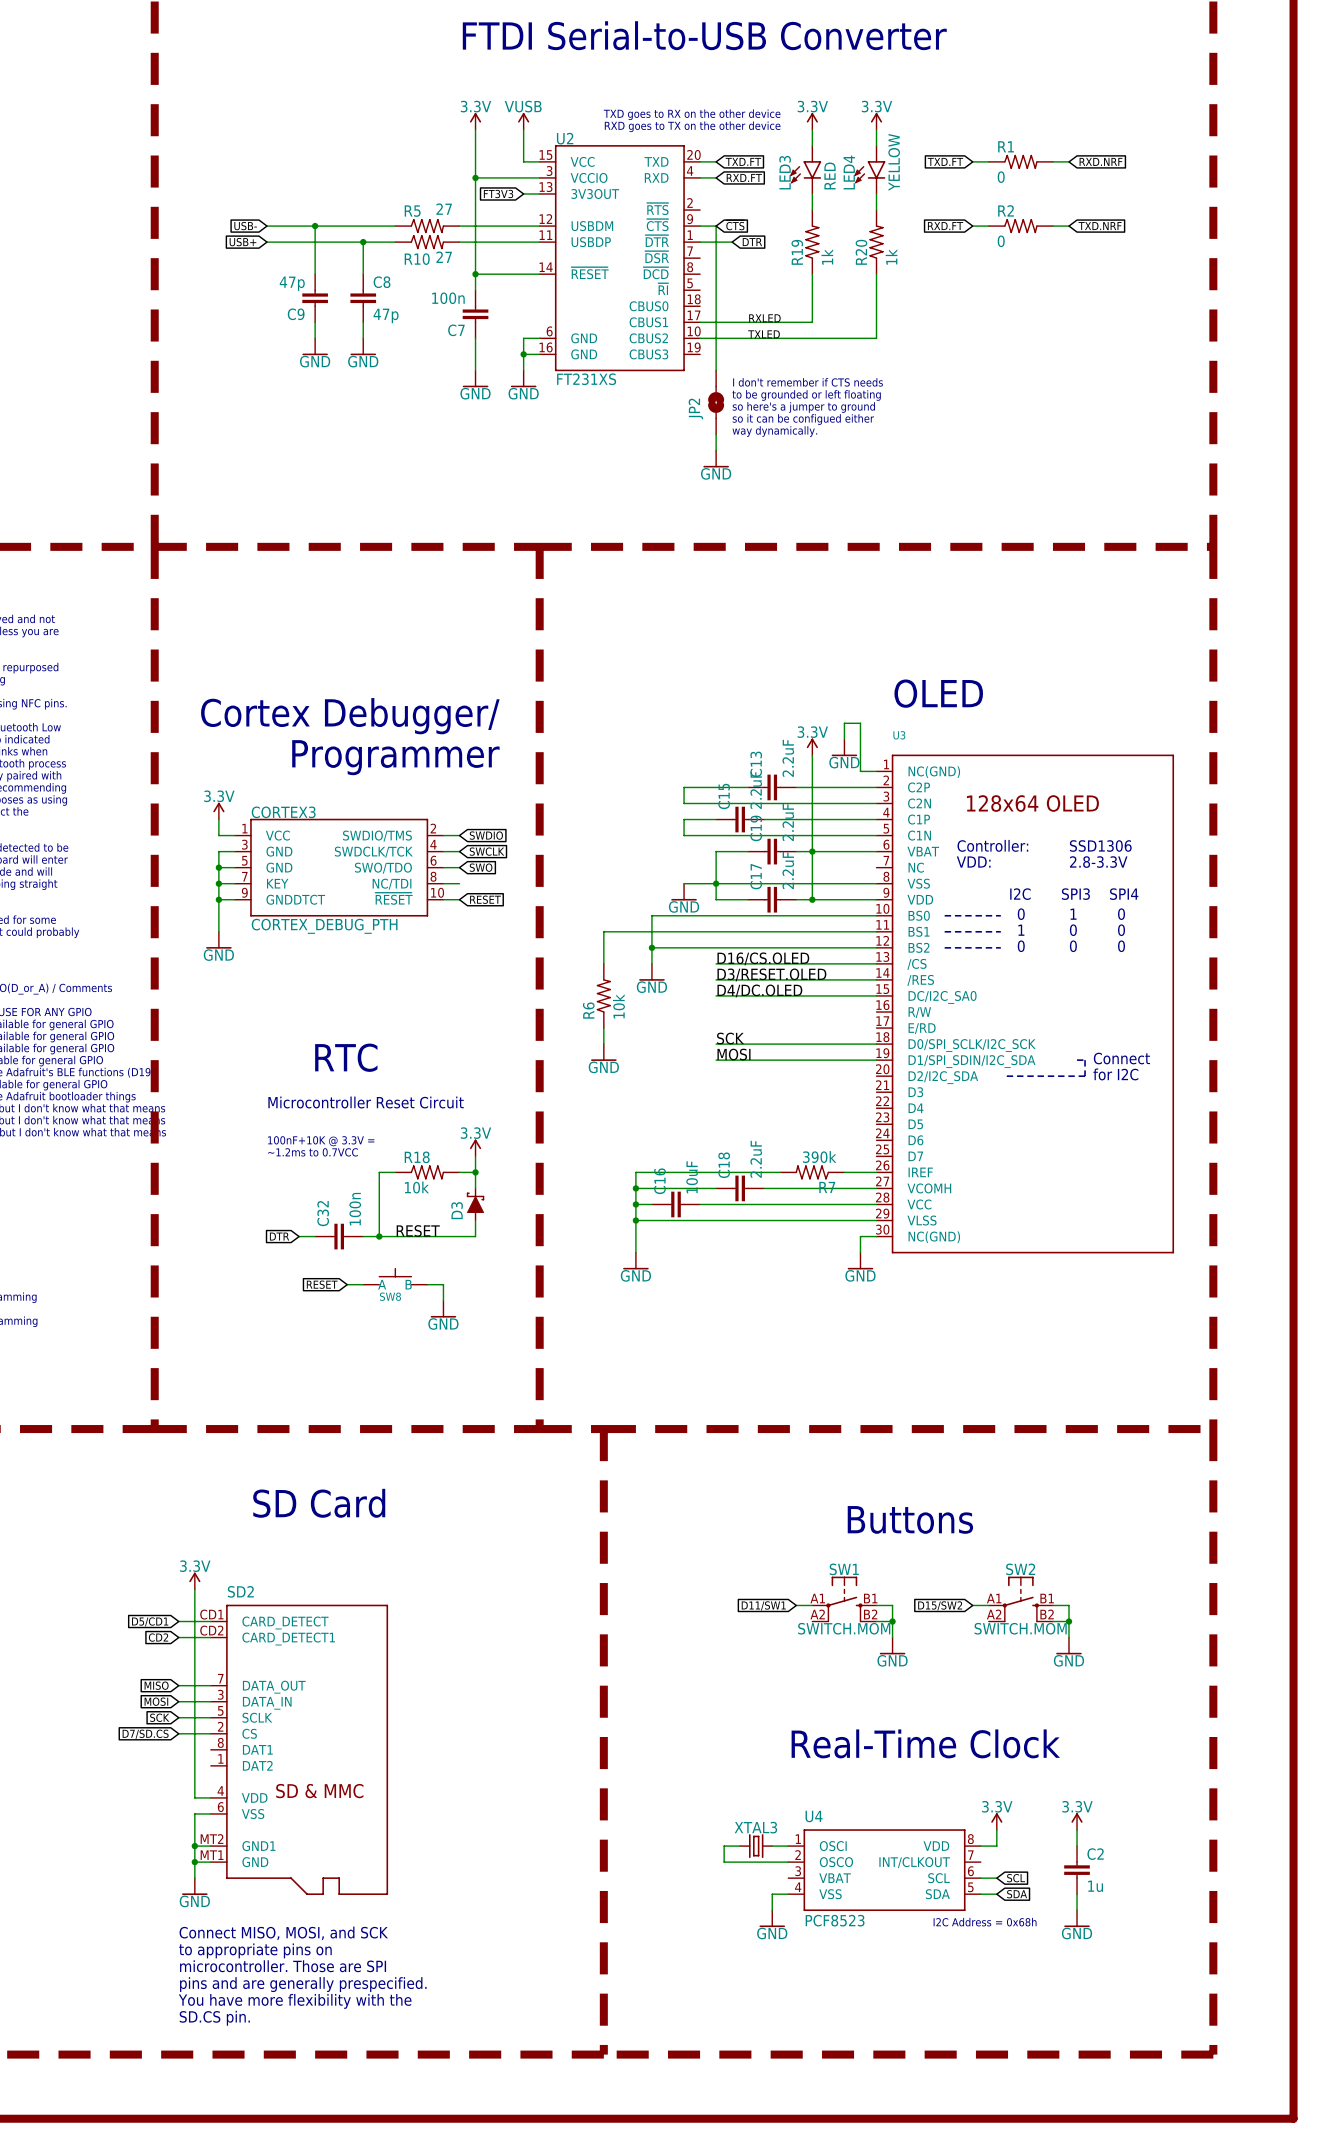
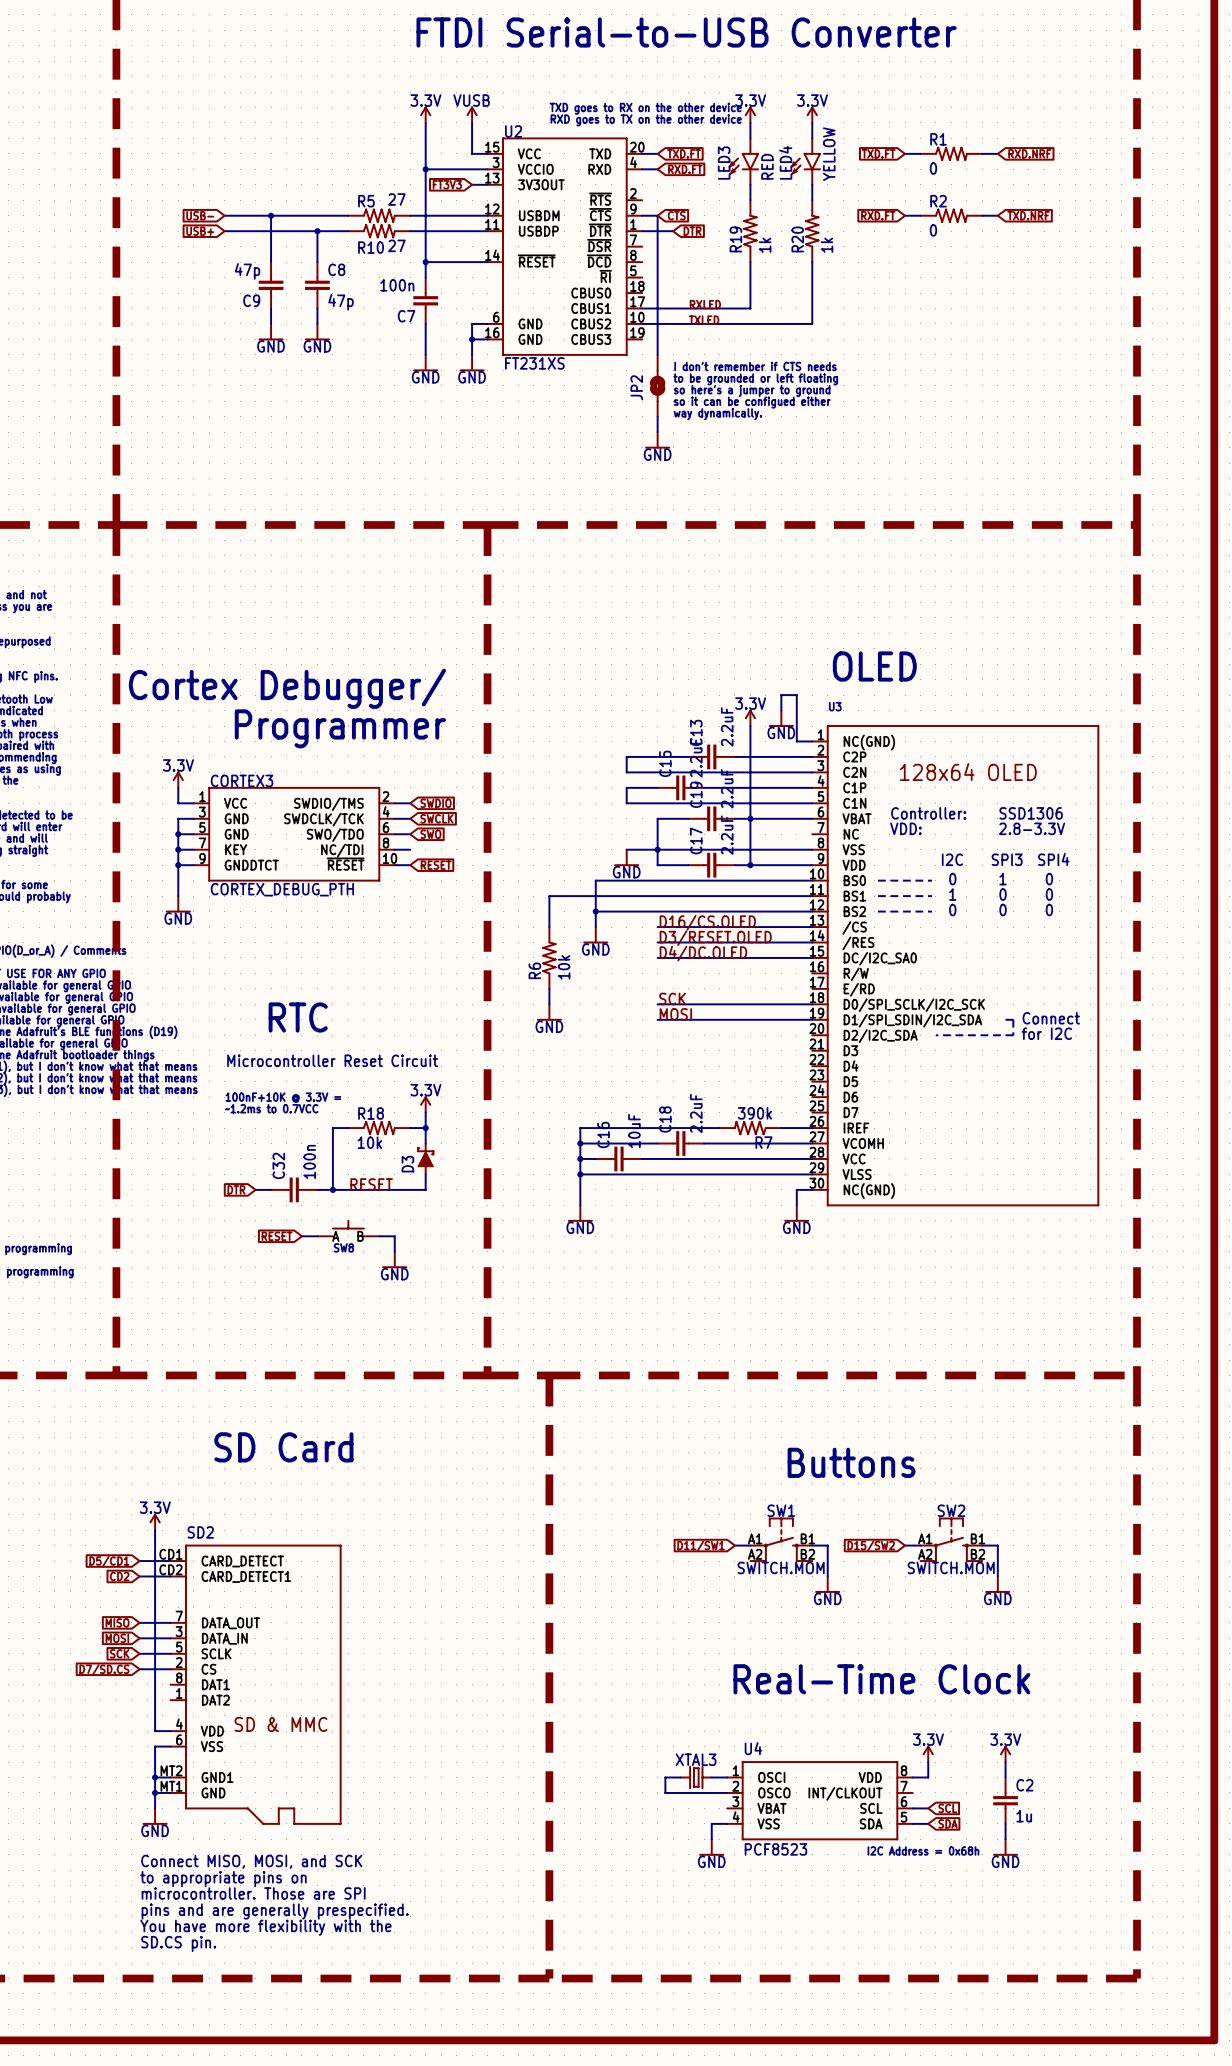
wire: (876, 1621) (892, 1621) -> none
junction: (892, 1621) -> none
wire: (1052, 1621) (1068, 1621) -> none
junction: (1068, 1621) -> none

